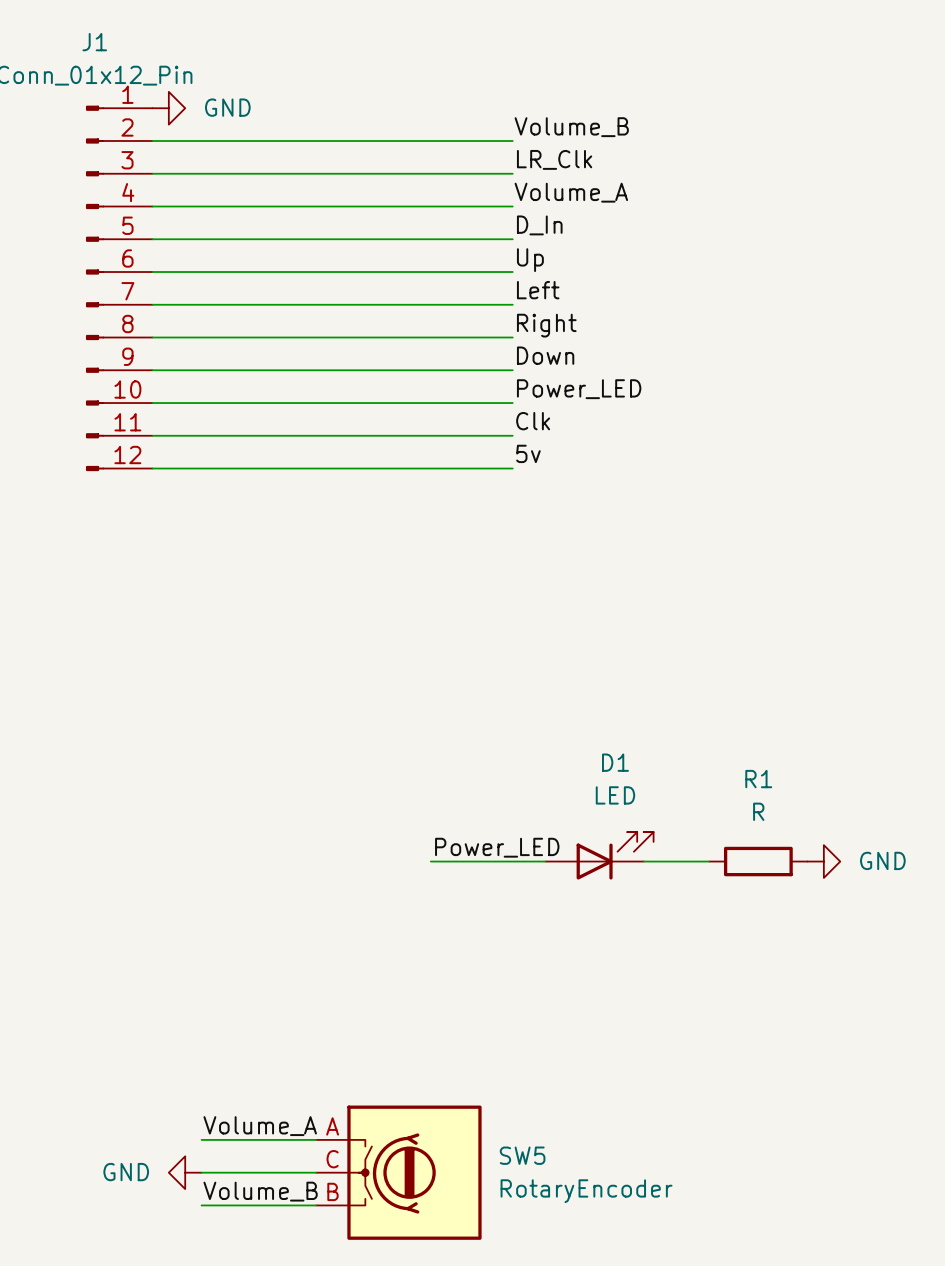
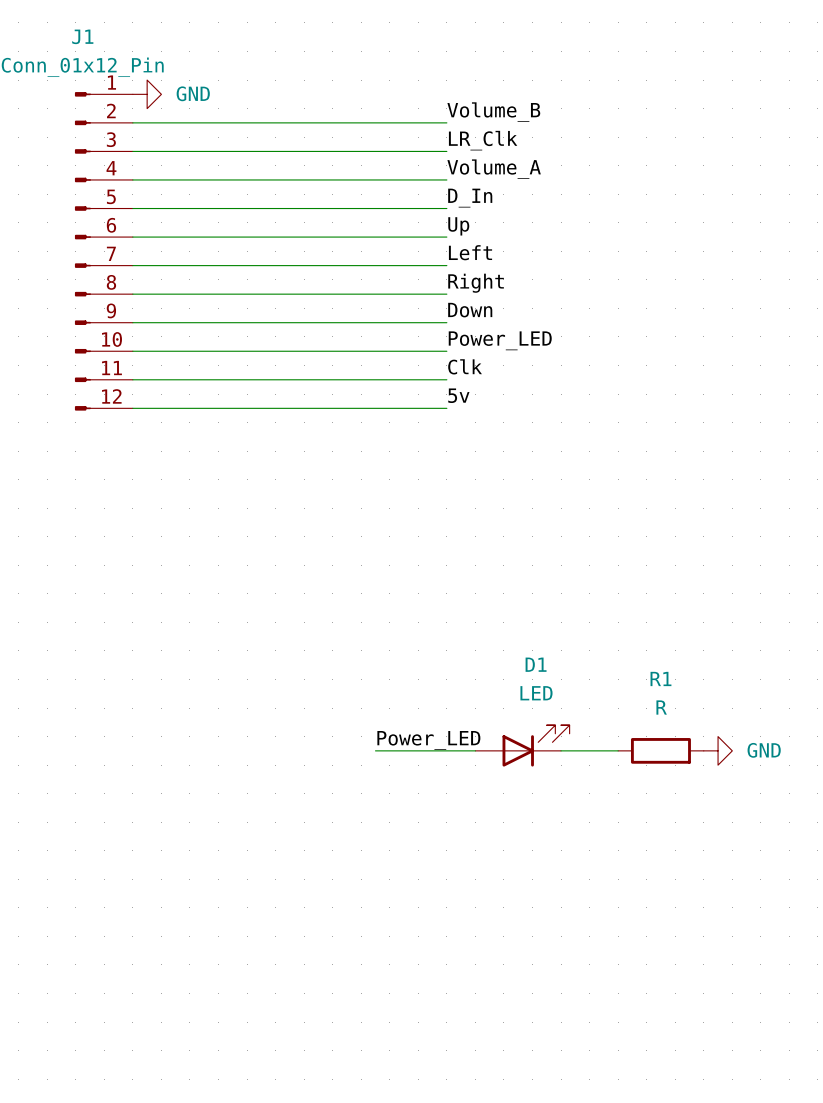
label: Volume_A (260, 1126) -> none
wire: (201, 1139) (316, 1139) -> none
power symbol: GND (185, 1172) -> none
wire: (201, 1172) (316, 1172) -> none
SW5: RotaryEncoder (398, 1172) -> none
label: Volume_B (260, 1191) -> none
wire: (201, 1205) (316, 1205) -> none

